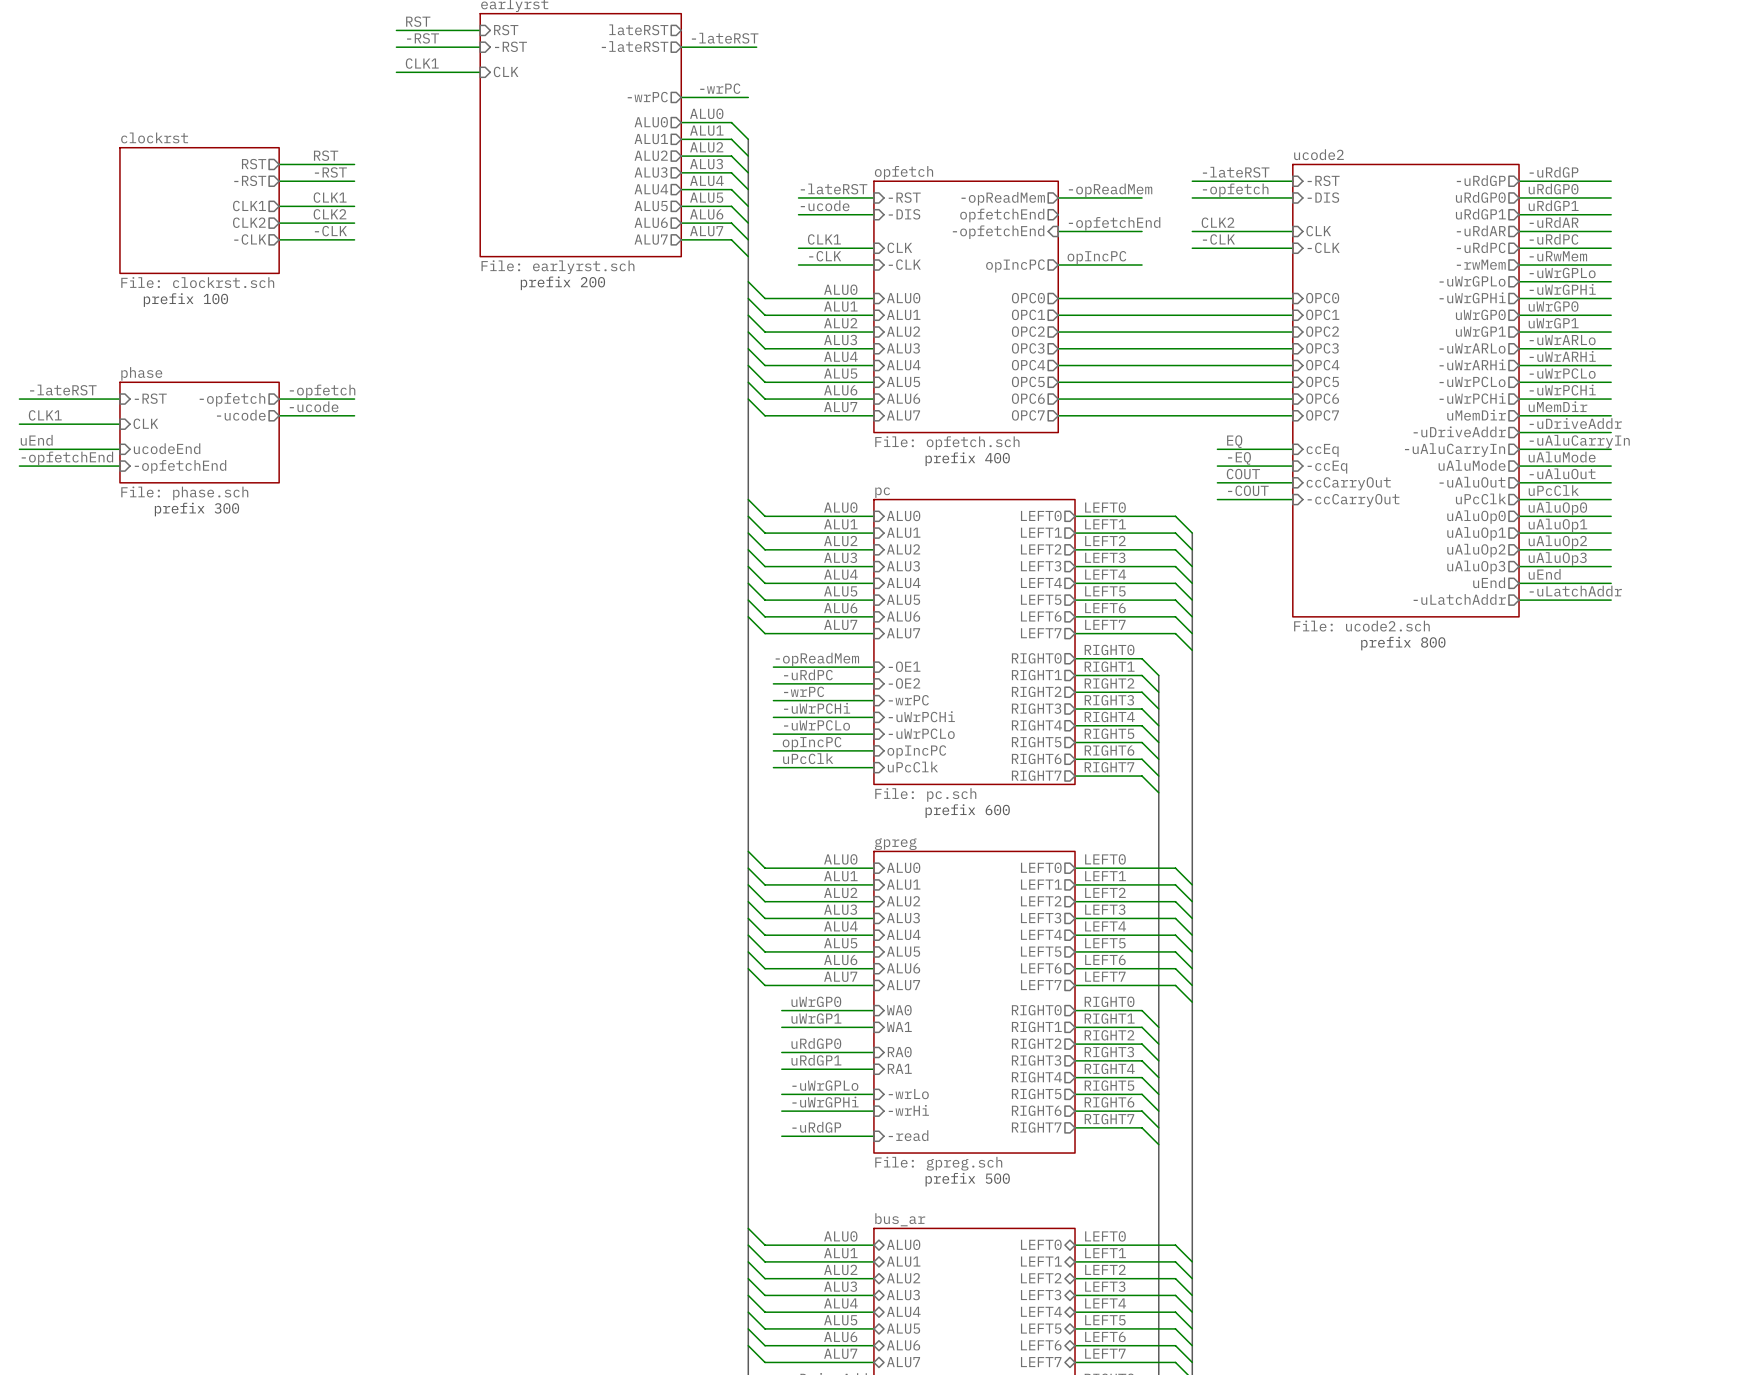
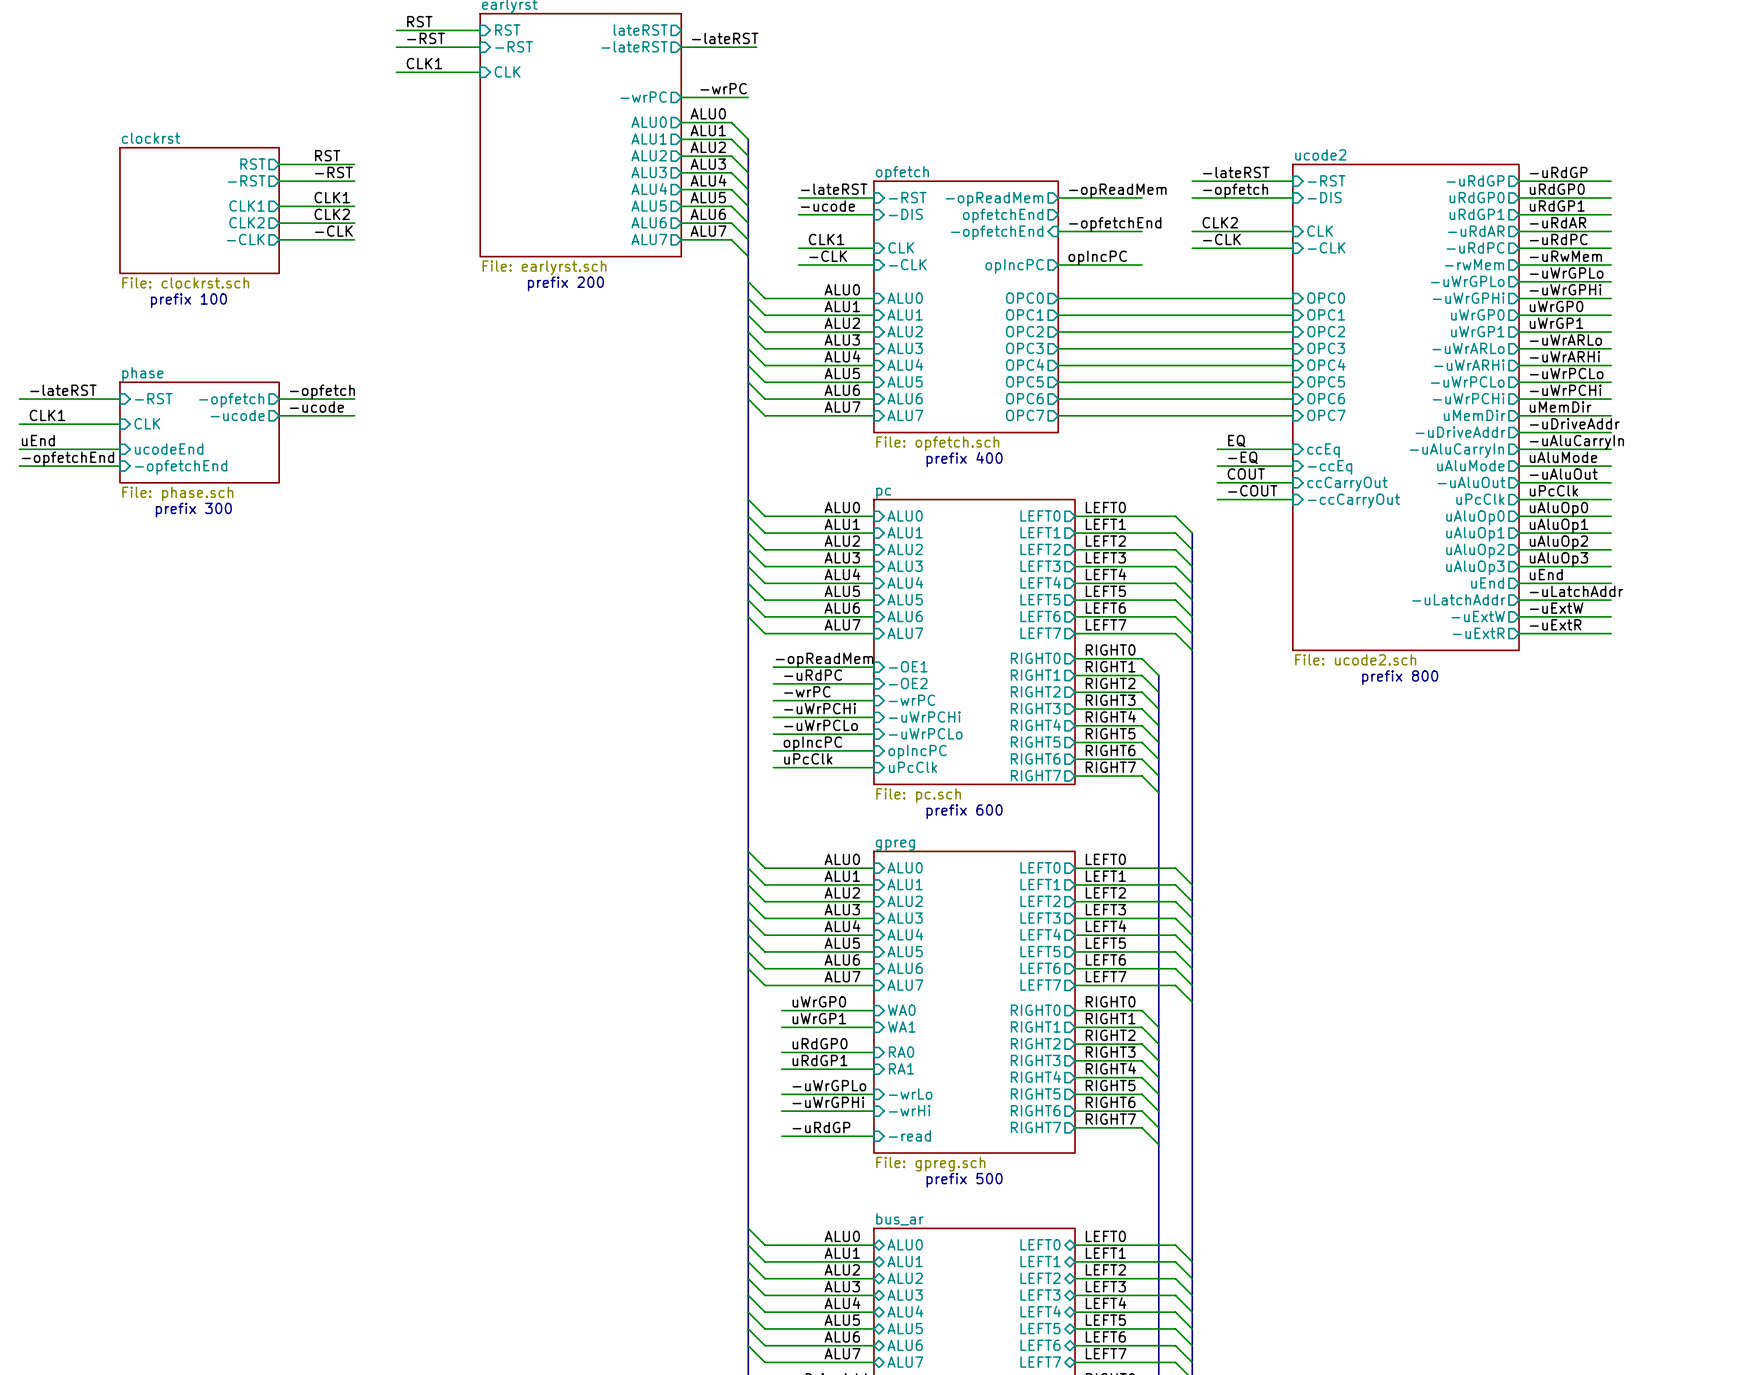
sheet ucode2 shape: [1292, 164, 1520, 617] -> [1292, 164, 1520, 651]
label: none -> -uExtW (1556, 608)
sheet pin: none -> -uExtW (1478, 616)
wire: none -> (1519, 616) (1611, 616)
label: none -> -uExtR (1555, 624)
sheet ucode2 value position: File: ucode2.sch (1361, 626) -> File: ucode2.sch (1355, 659)
sheet pin: none -> -uExtR (1478, 633)
wire: none -> (1519, 633) (1611, 633)
text position: prefix 800 (1403, 643) -> prefix 800 (1400, 677)

